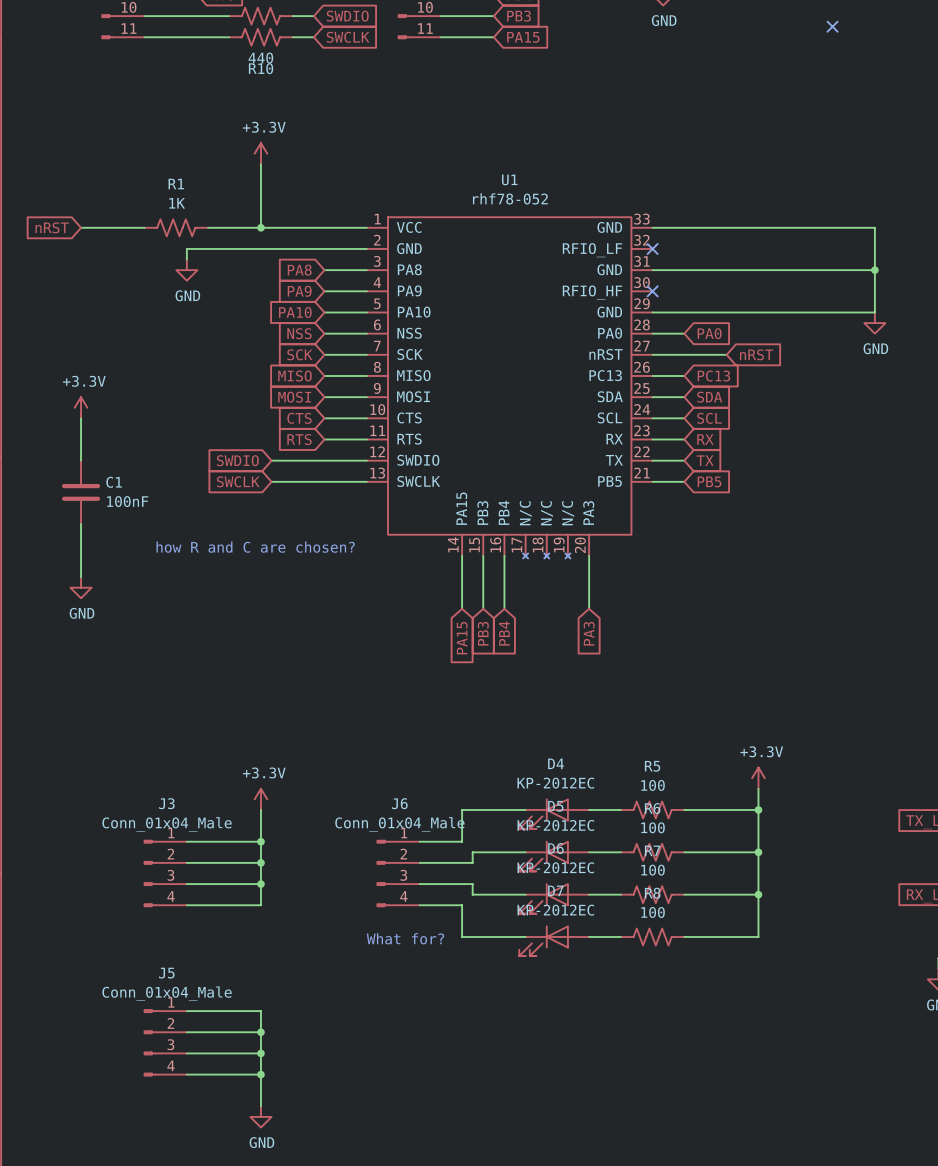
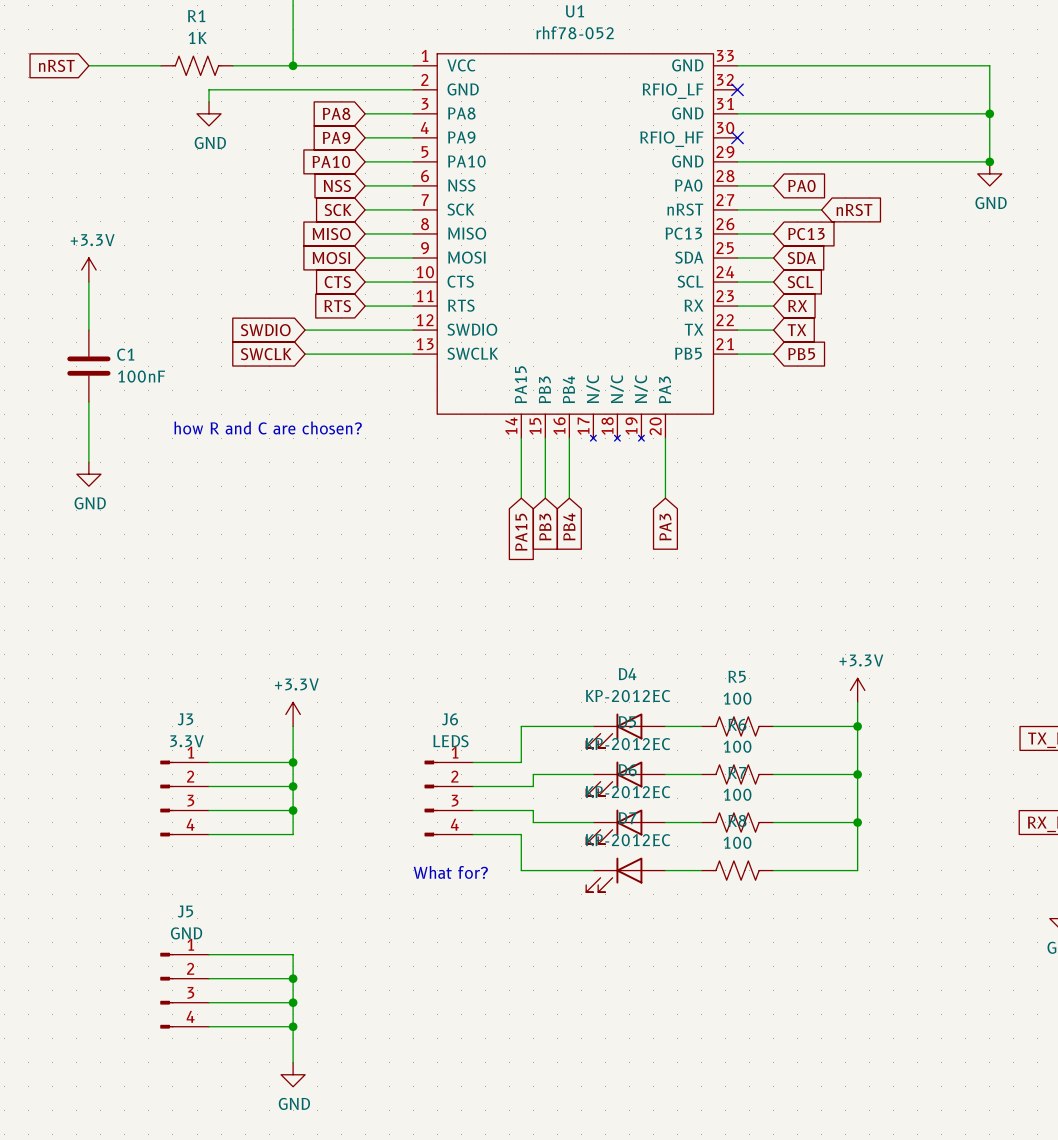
junction: none -> (989, 161)
J3 value: Conn_01x04_Male (167, 824) -> 3.3V (186, 741)
J6 value: Conn_01x04_Male (399, 824) -> LEDS (450, 741)
J5 value: Conn_01x04_Male (167, 993) -> GND (186, 933)

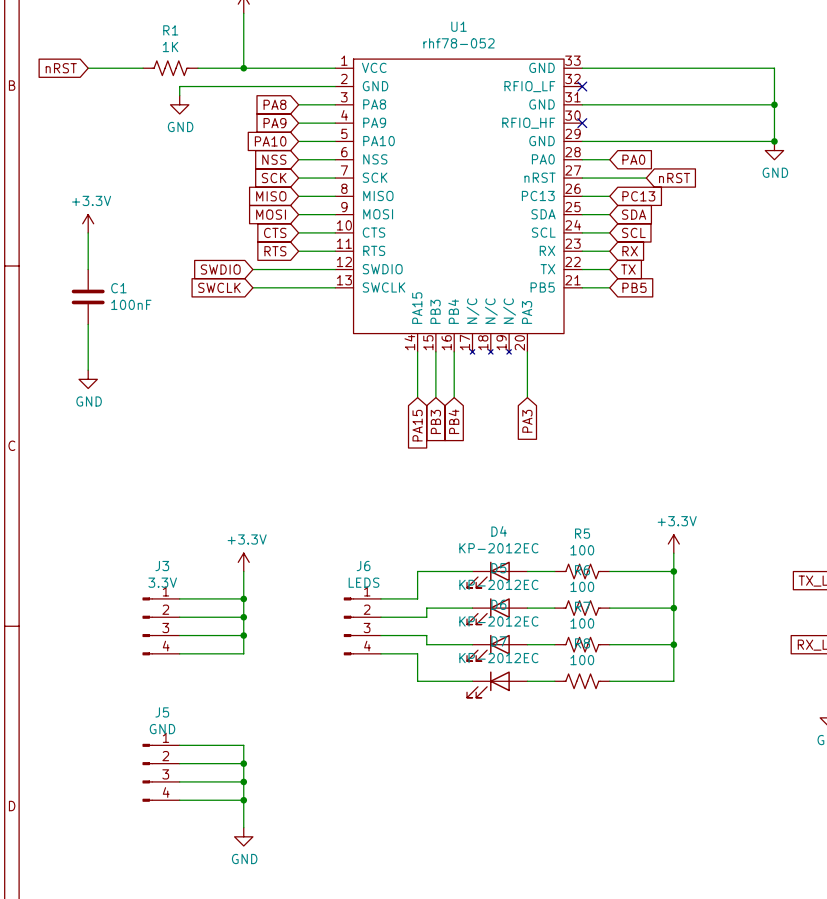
text: how R and C are chosen? (268, 427) -> none
text: What for? (450, 872) -> none

